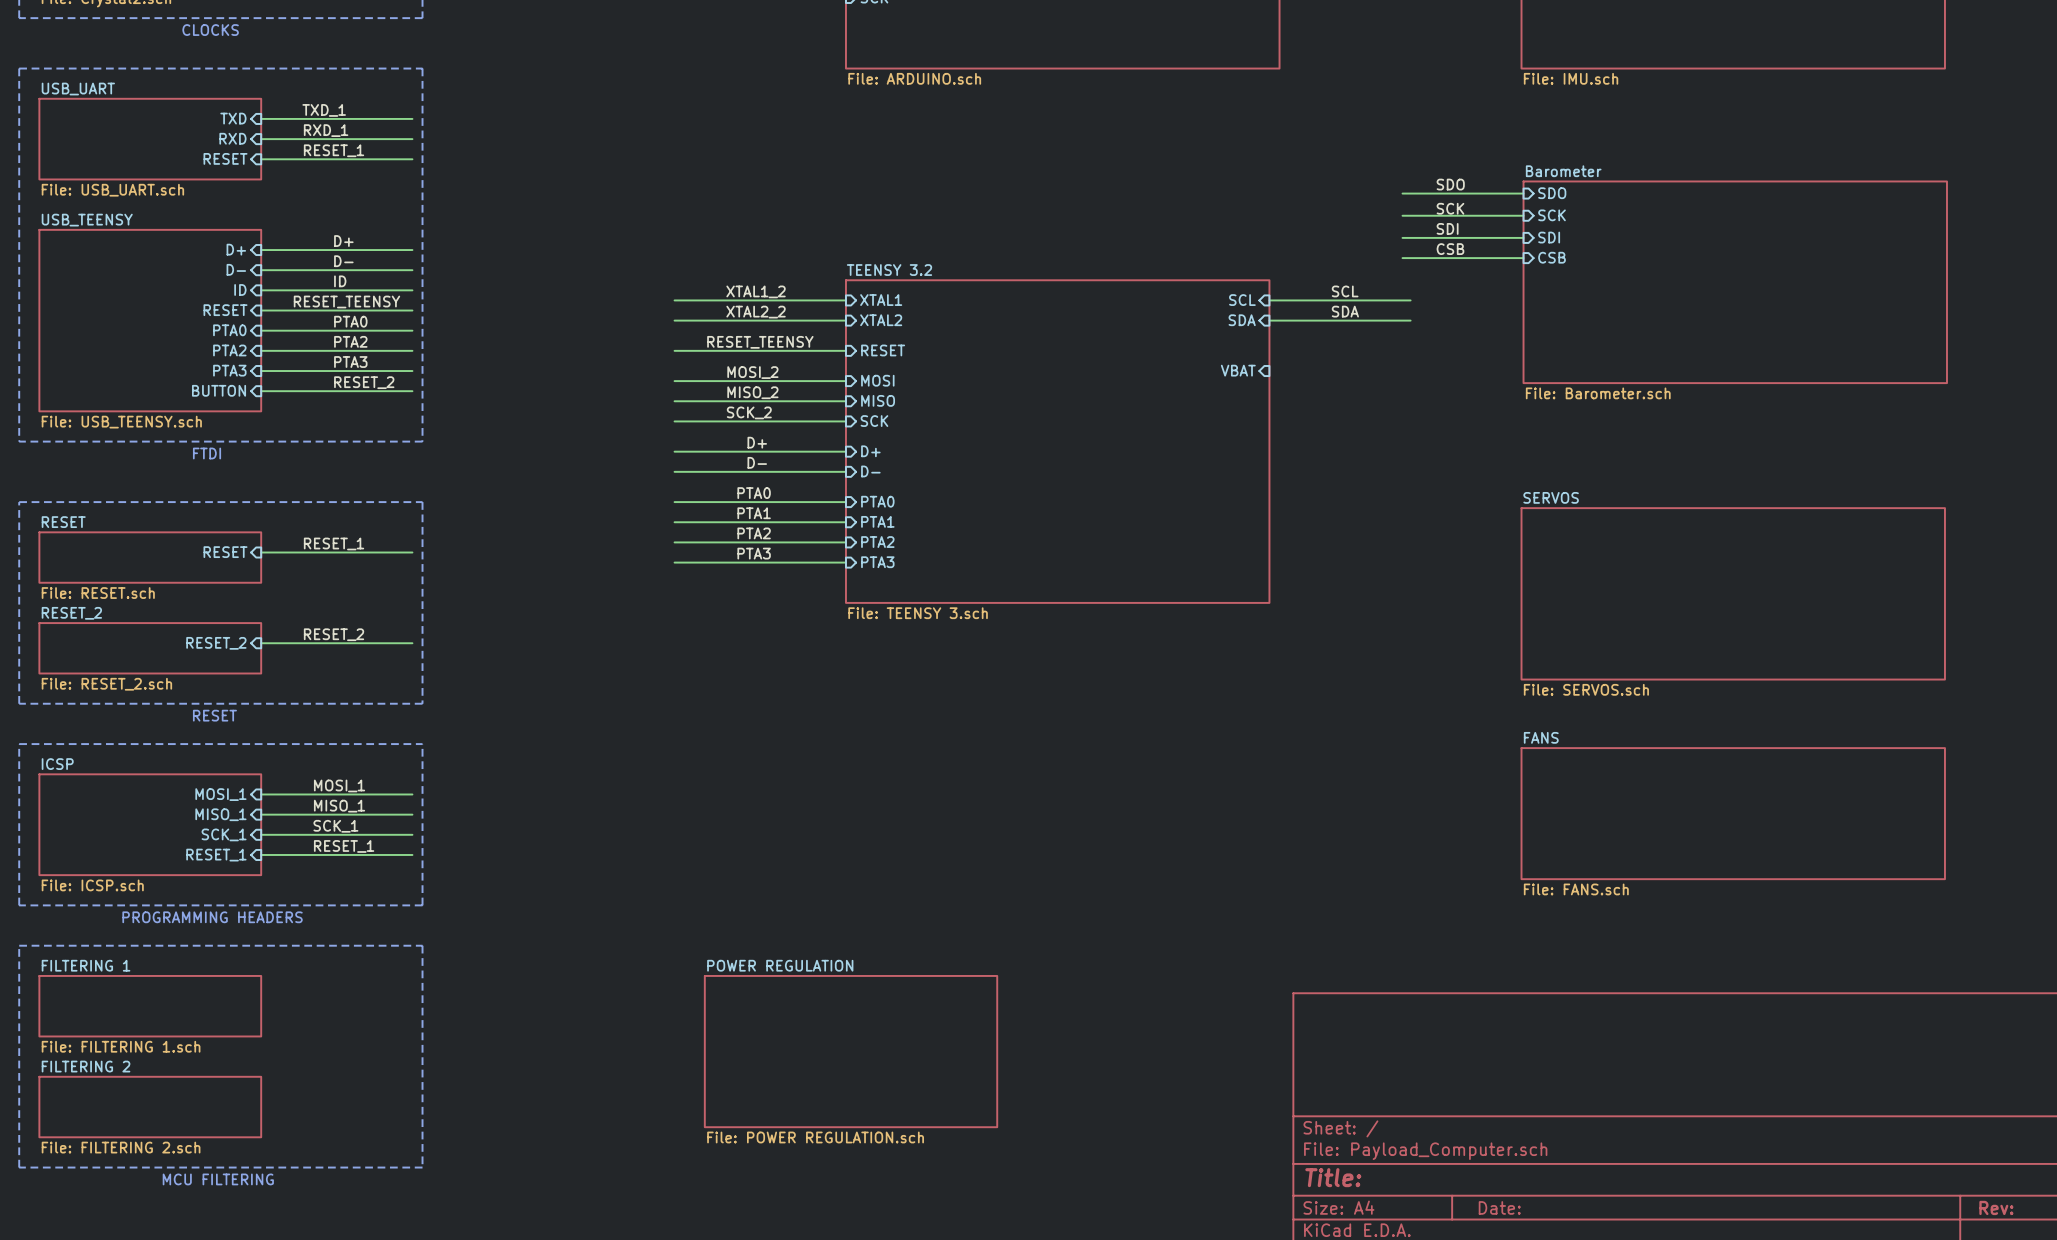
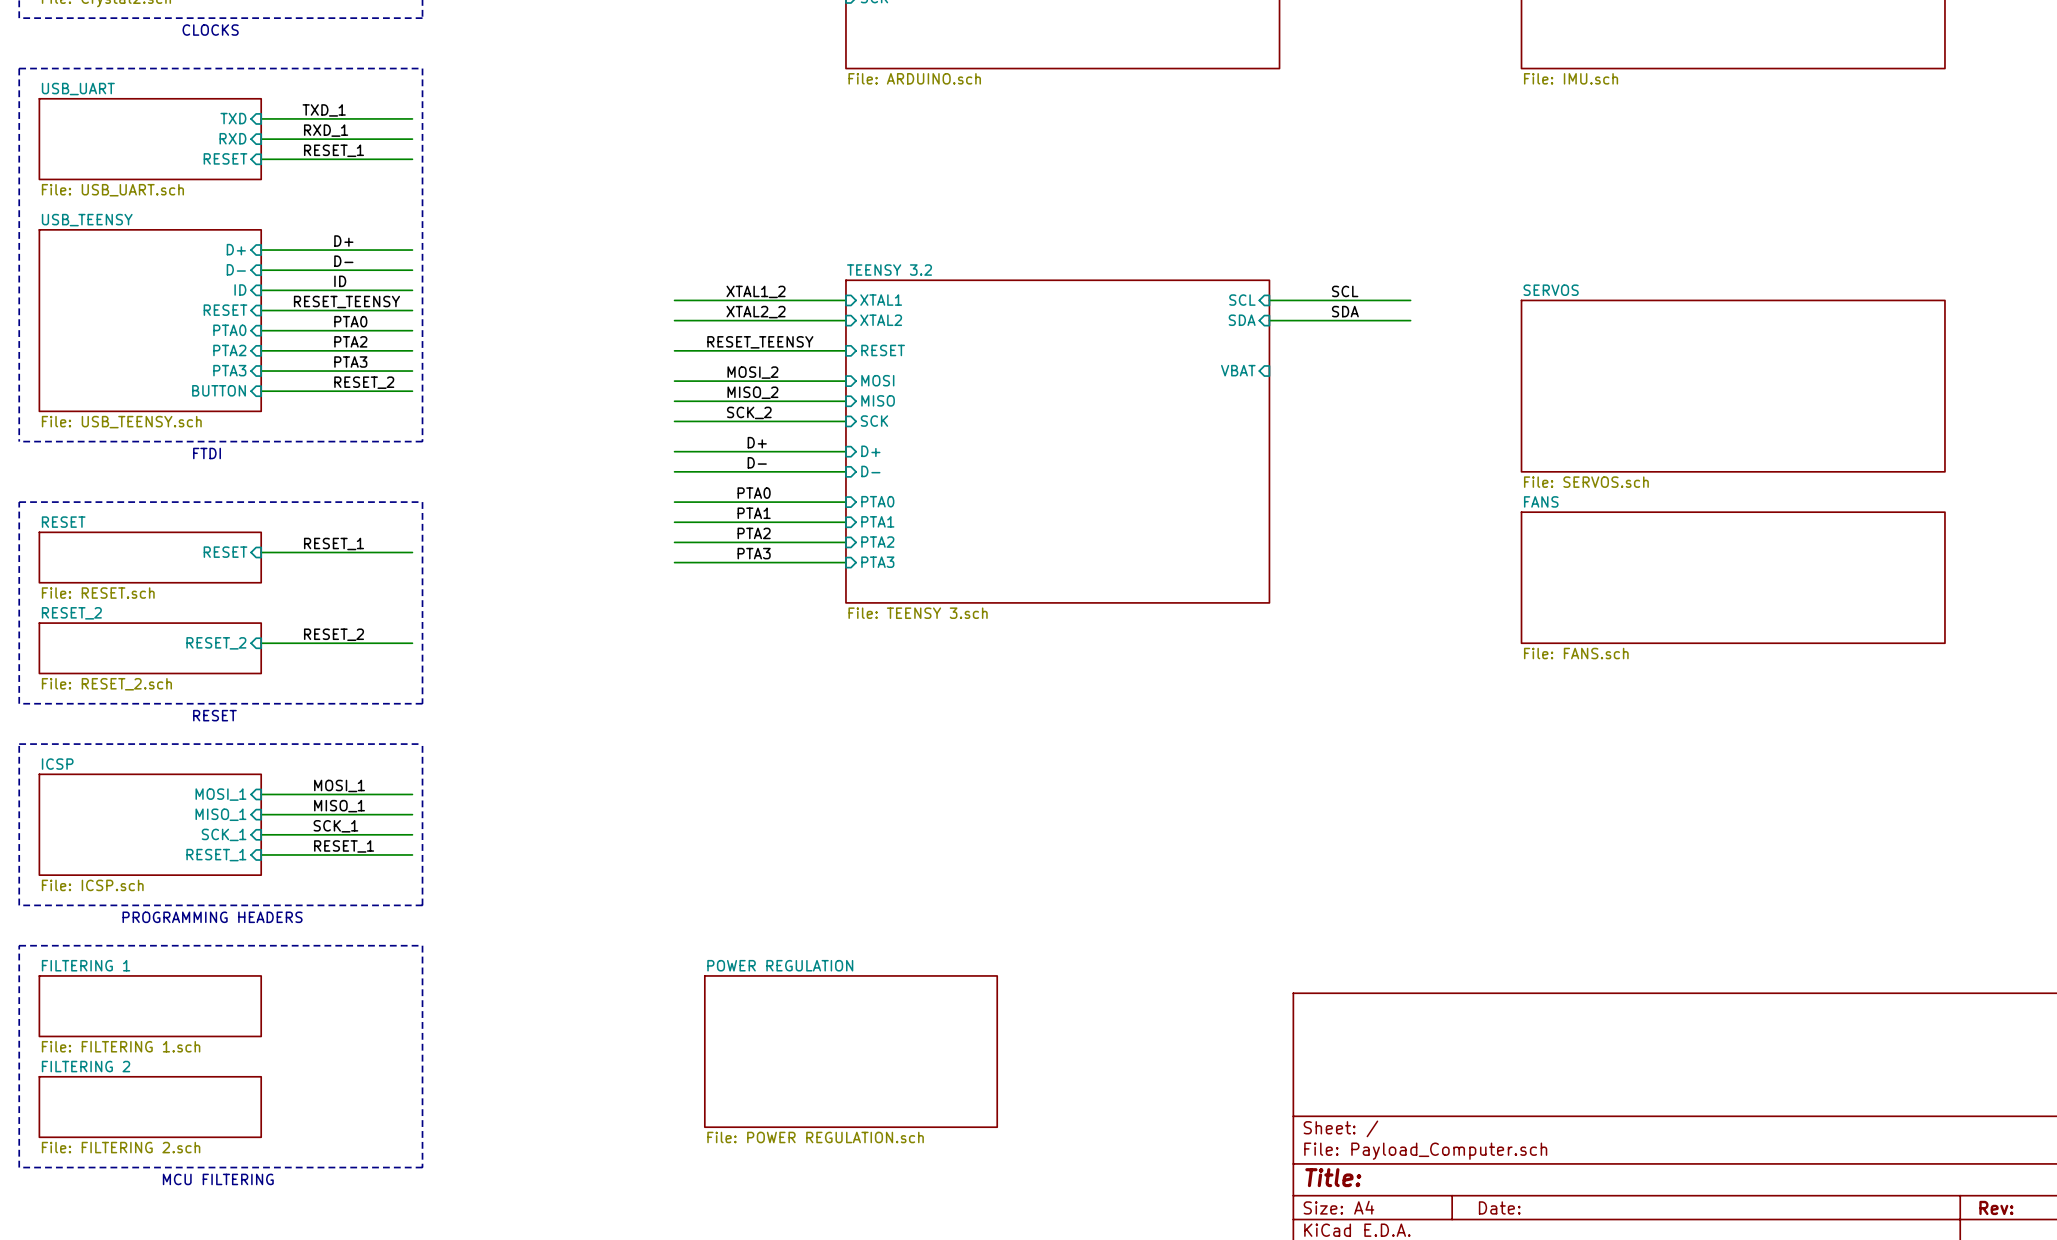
label: SDO (1450, 184) -> none
wire: (1402, 193) (1523, 193) -> none
sheet pin: SDO (1552, 193) -> none
label: SCK (1450, 208) -> none
wire: (1402, 215) (1523, 215) -> none
sheet pin: SCK (1552, 215) -> none
label: SDI (1447, 228) -> none
wire: (1402, 237) (1523, 237) -> none
sheet pin: SDI (1549, 237) -> none
label: CSB (1450, 249) -> none
sheet pin: CSB (1552, 257) -> none
wire: (1402, 258) (1523, 258) -> none
sheet Barometer: File: Barometer.sch (1735, 282) -> none
sheet SERVOS: none -> File: SERVOS.sch (1733, 386)
sheet FANS: none -> File: FANS.sch (1733, 577)
sheet SERVOS: File: SERVOS.sch (1733, 593) -> none
sheet FANS: File: FANS.sch (1733, 813) -> none

